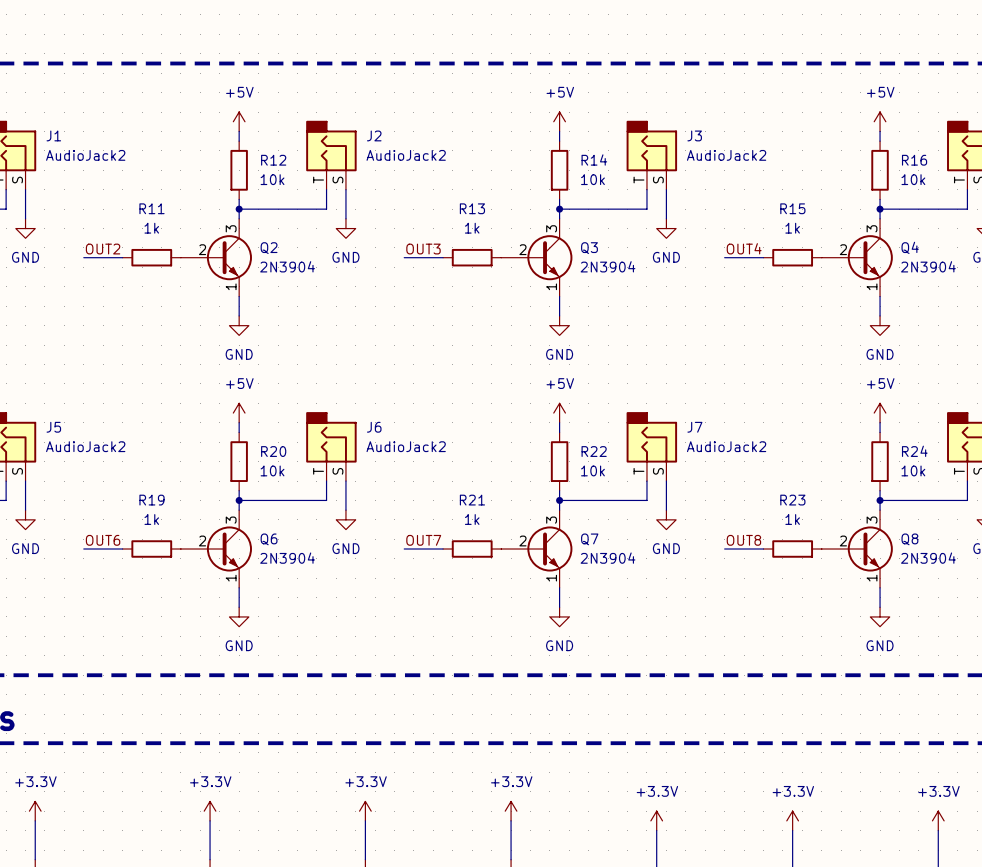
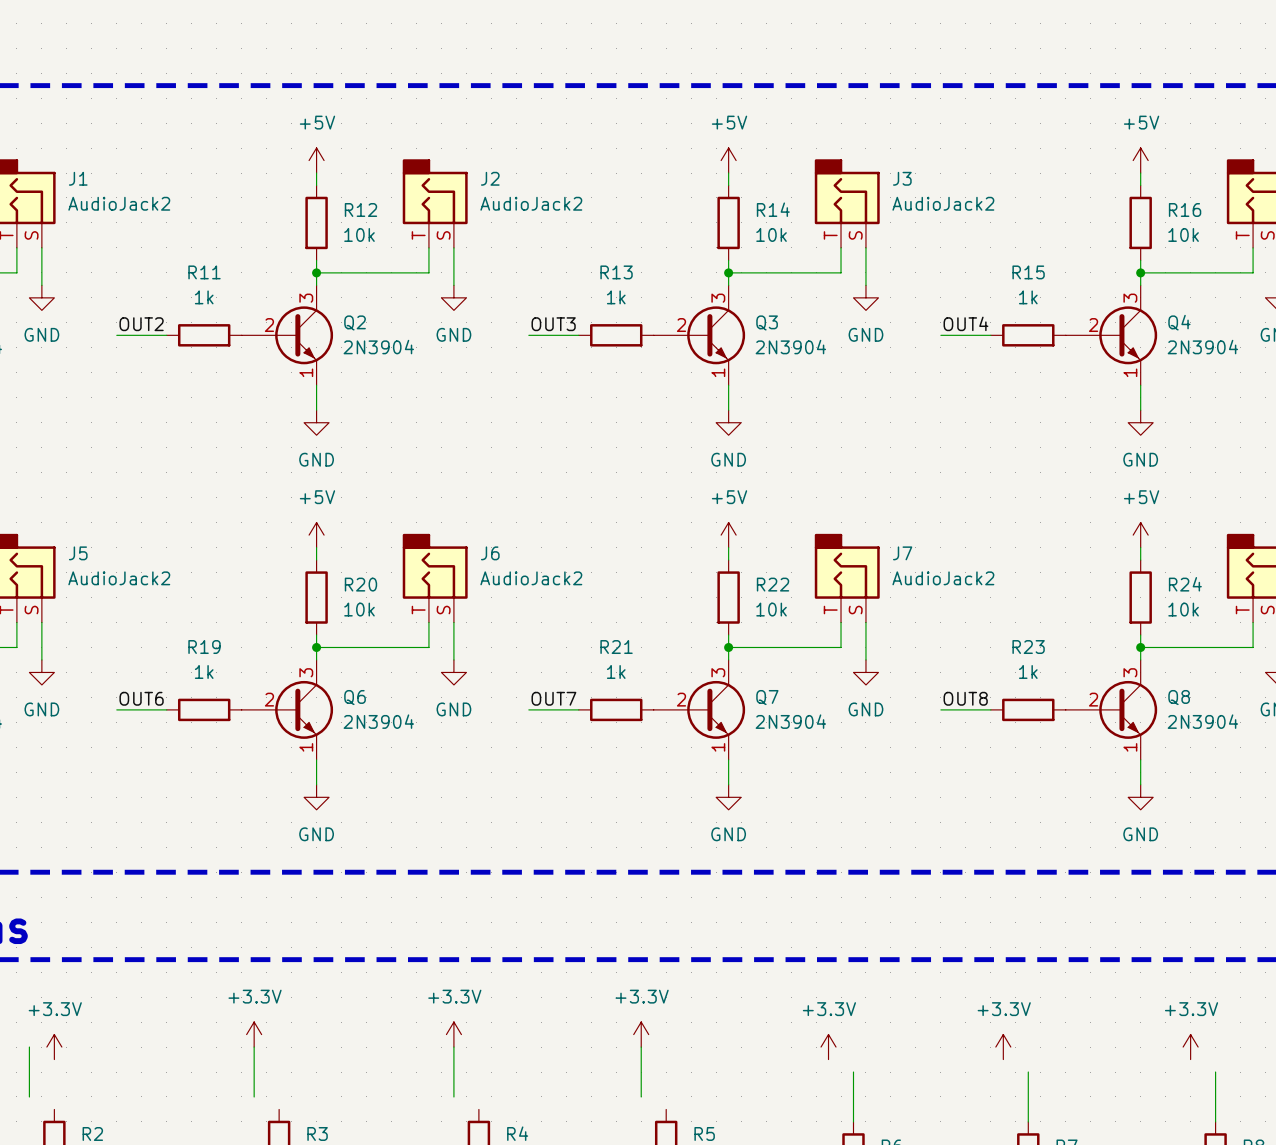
power symbol position: +3.3V (210, 811) -> +3.3V (254, 1034)
power symbol position: +3.3V (365, 811) -> +3.3V (453, 1034)
power symbol position: +3.3V (511, 811) -> +3.3V (641, 1034)
wire: (35, 820) (35, 859) -> (29, 1047) (29, 1096)
wire: (210, 820) (210, 859) -> (254, 1047) (254, 1096)
wire: (365, 820) (365, 859) -> (453, 1047) (453, 1096)
wire: (511, 820) (511, 859) -> (641, 1047) (641, 1096)
power symbol position: +3.3V (656, 820) -> +3.3V (828, 1047)
power symbol position: +3.3V (792, 820) -> +3.3V (1003, 1047)
power symbol position: +3.3V (938, 820) -> +3.3V (1190, 1047)

